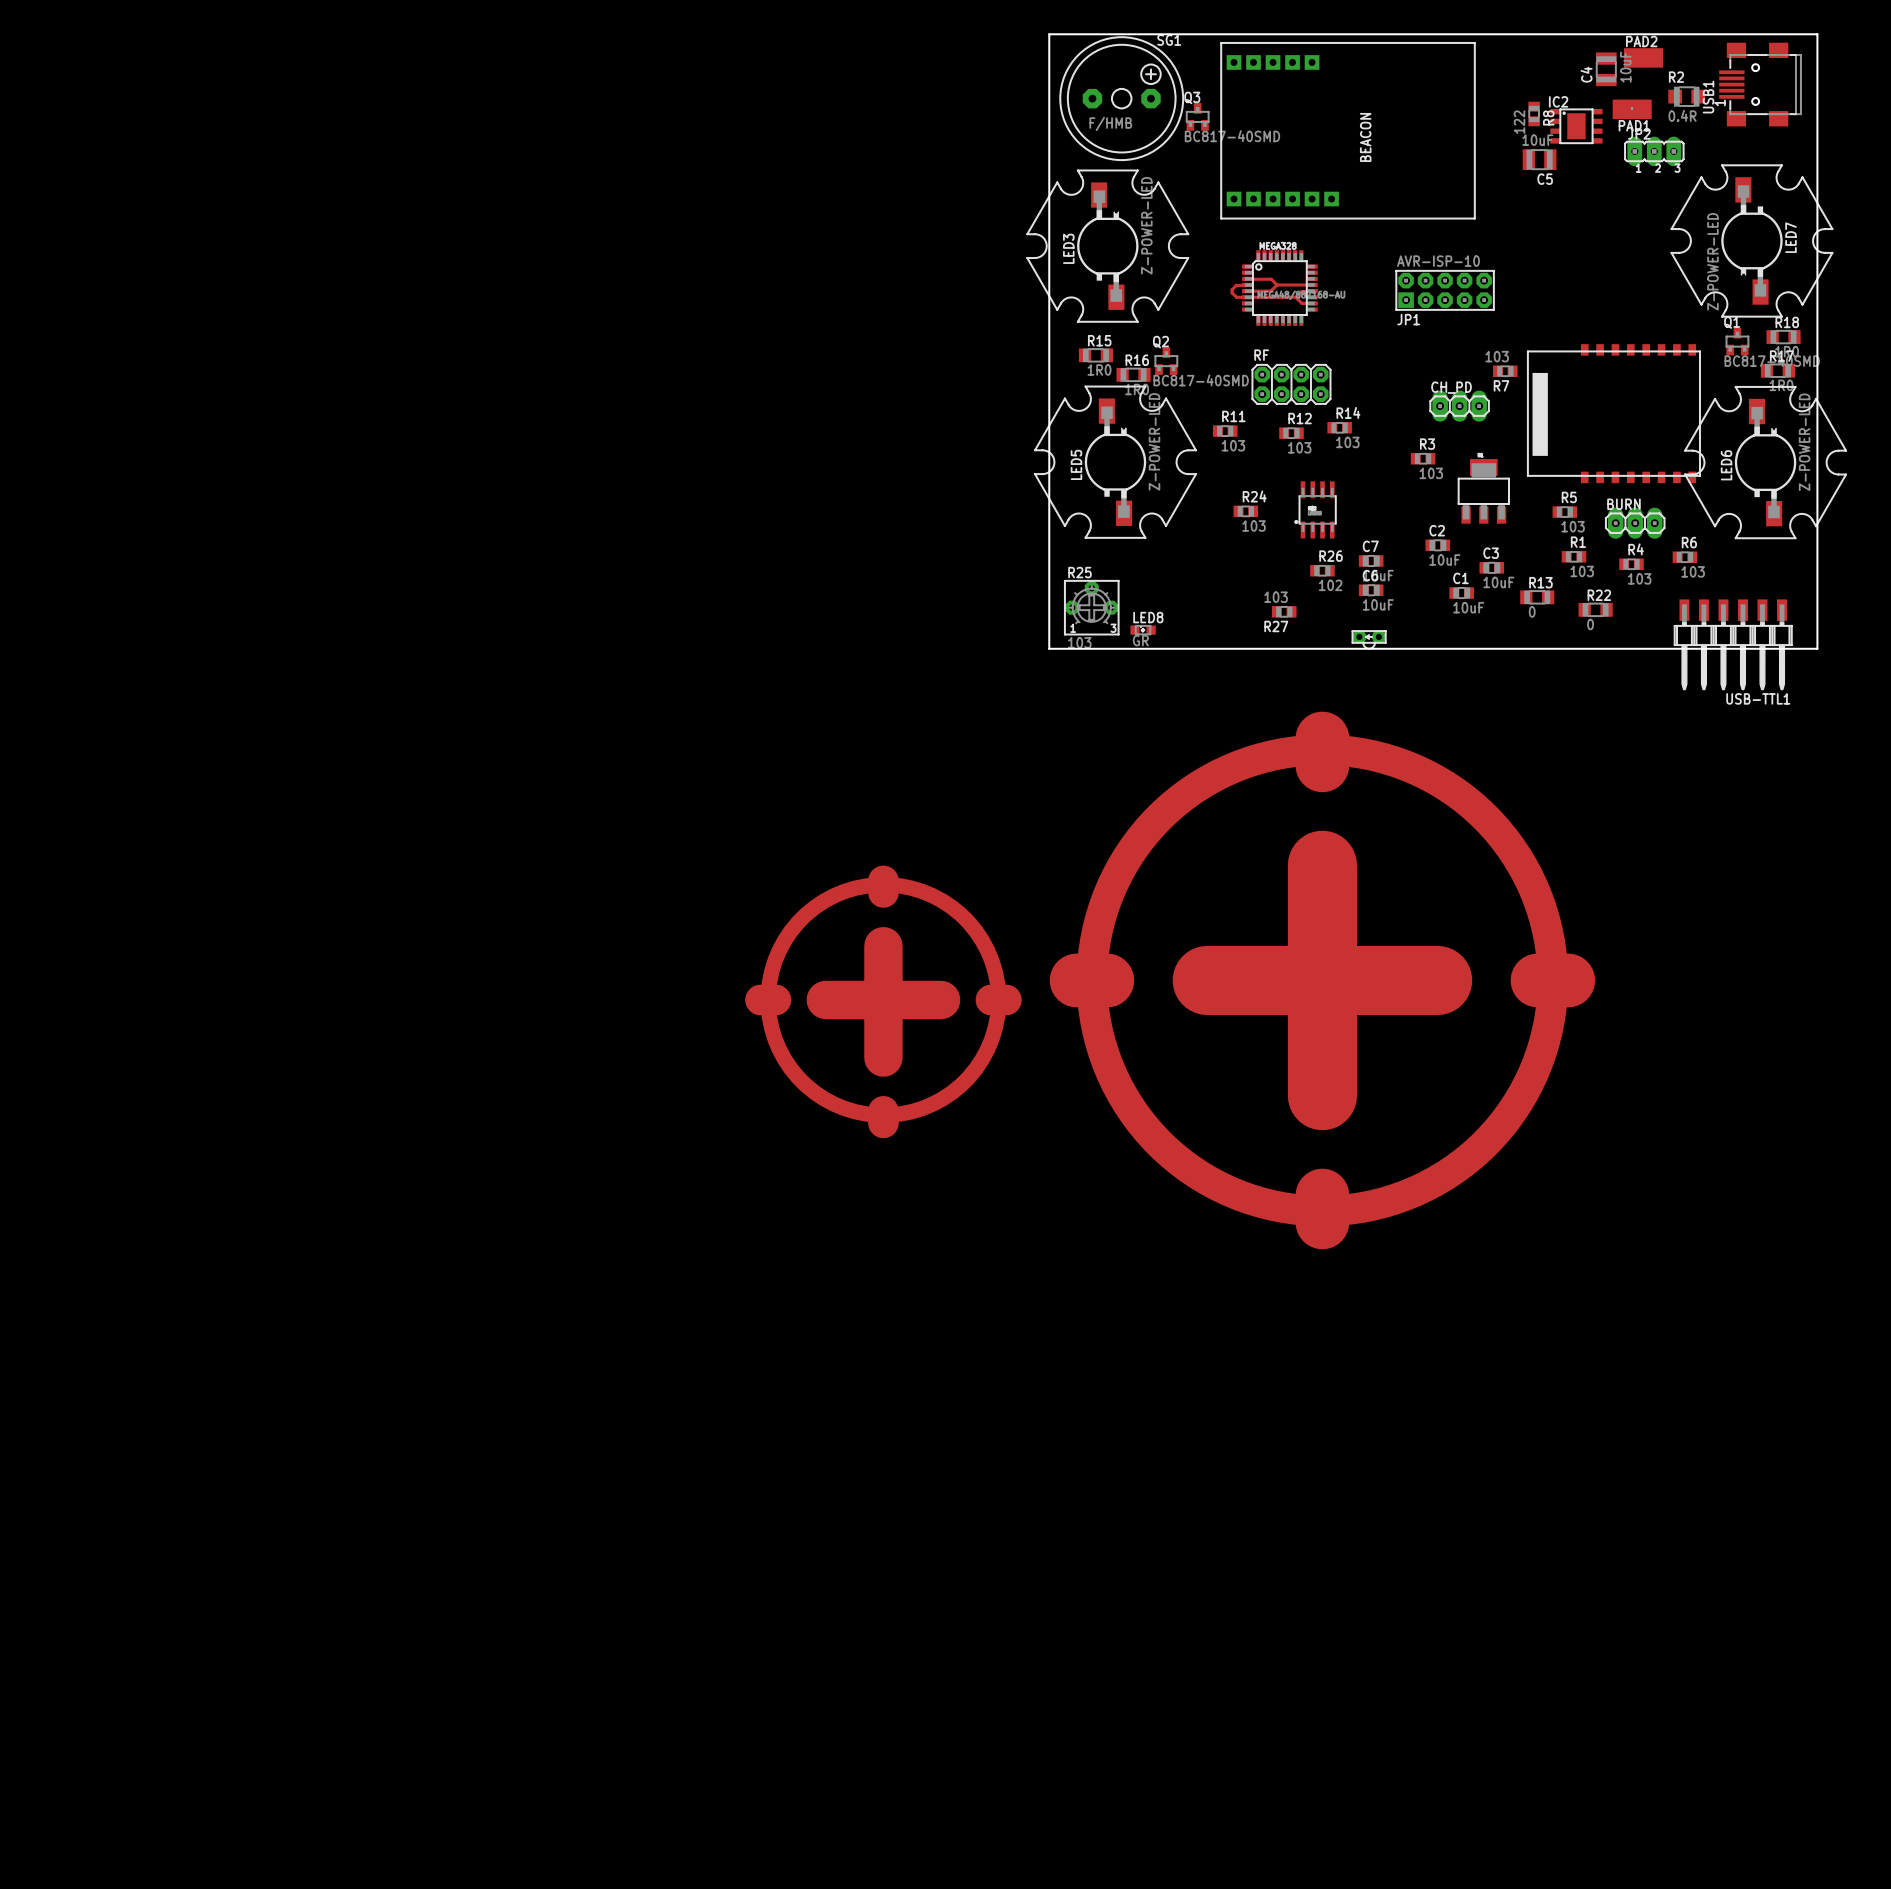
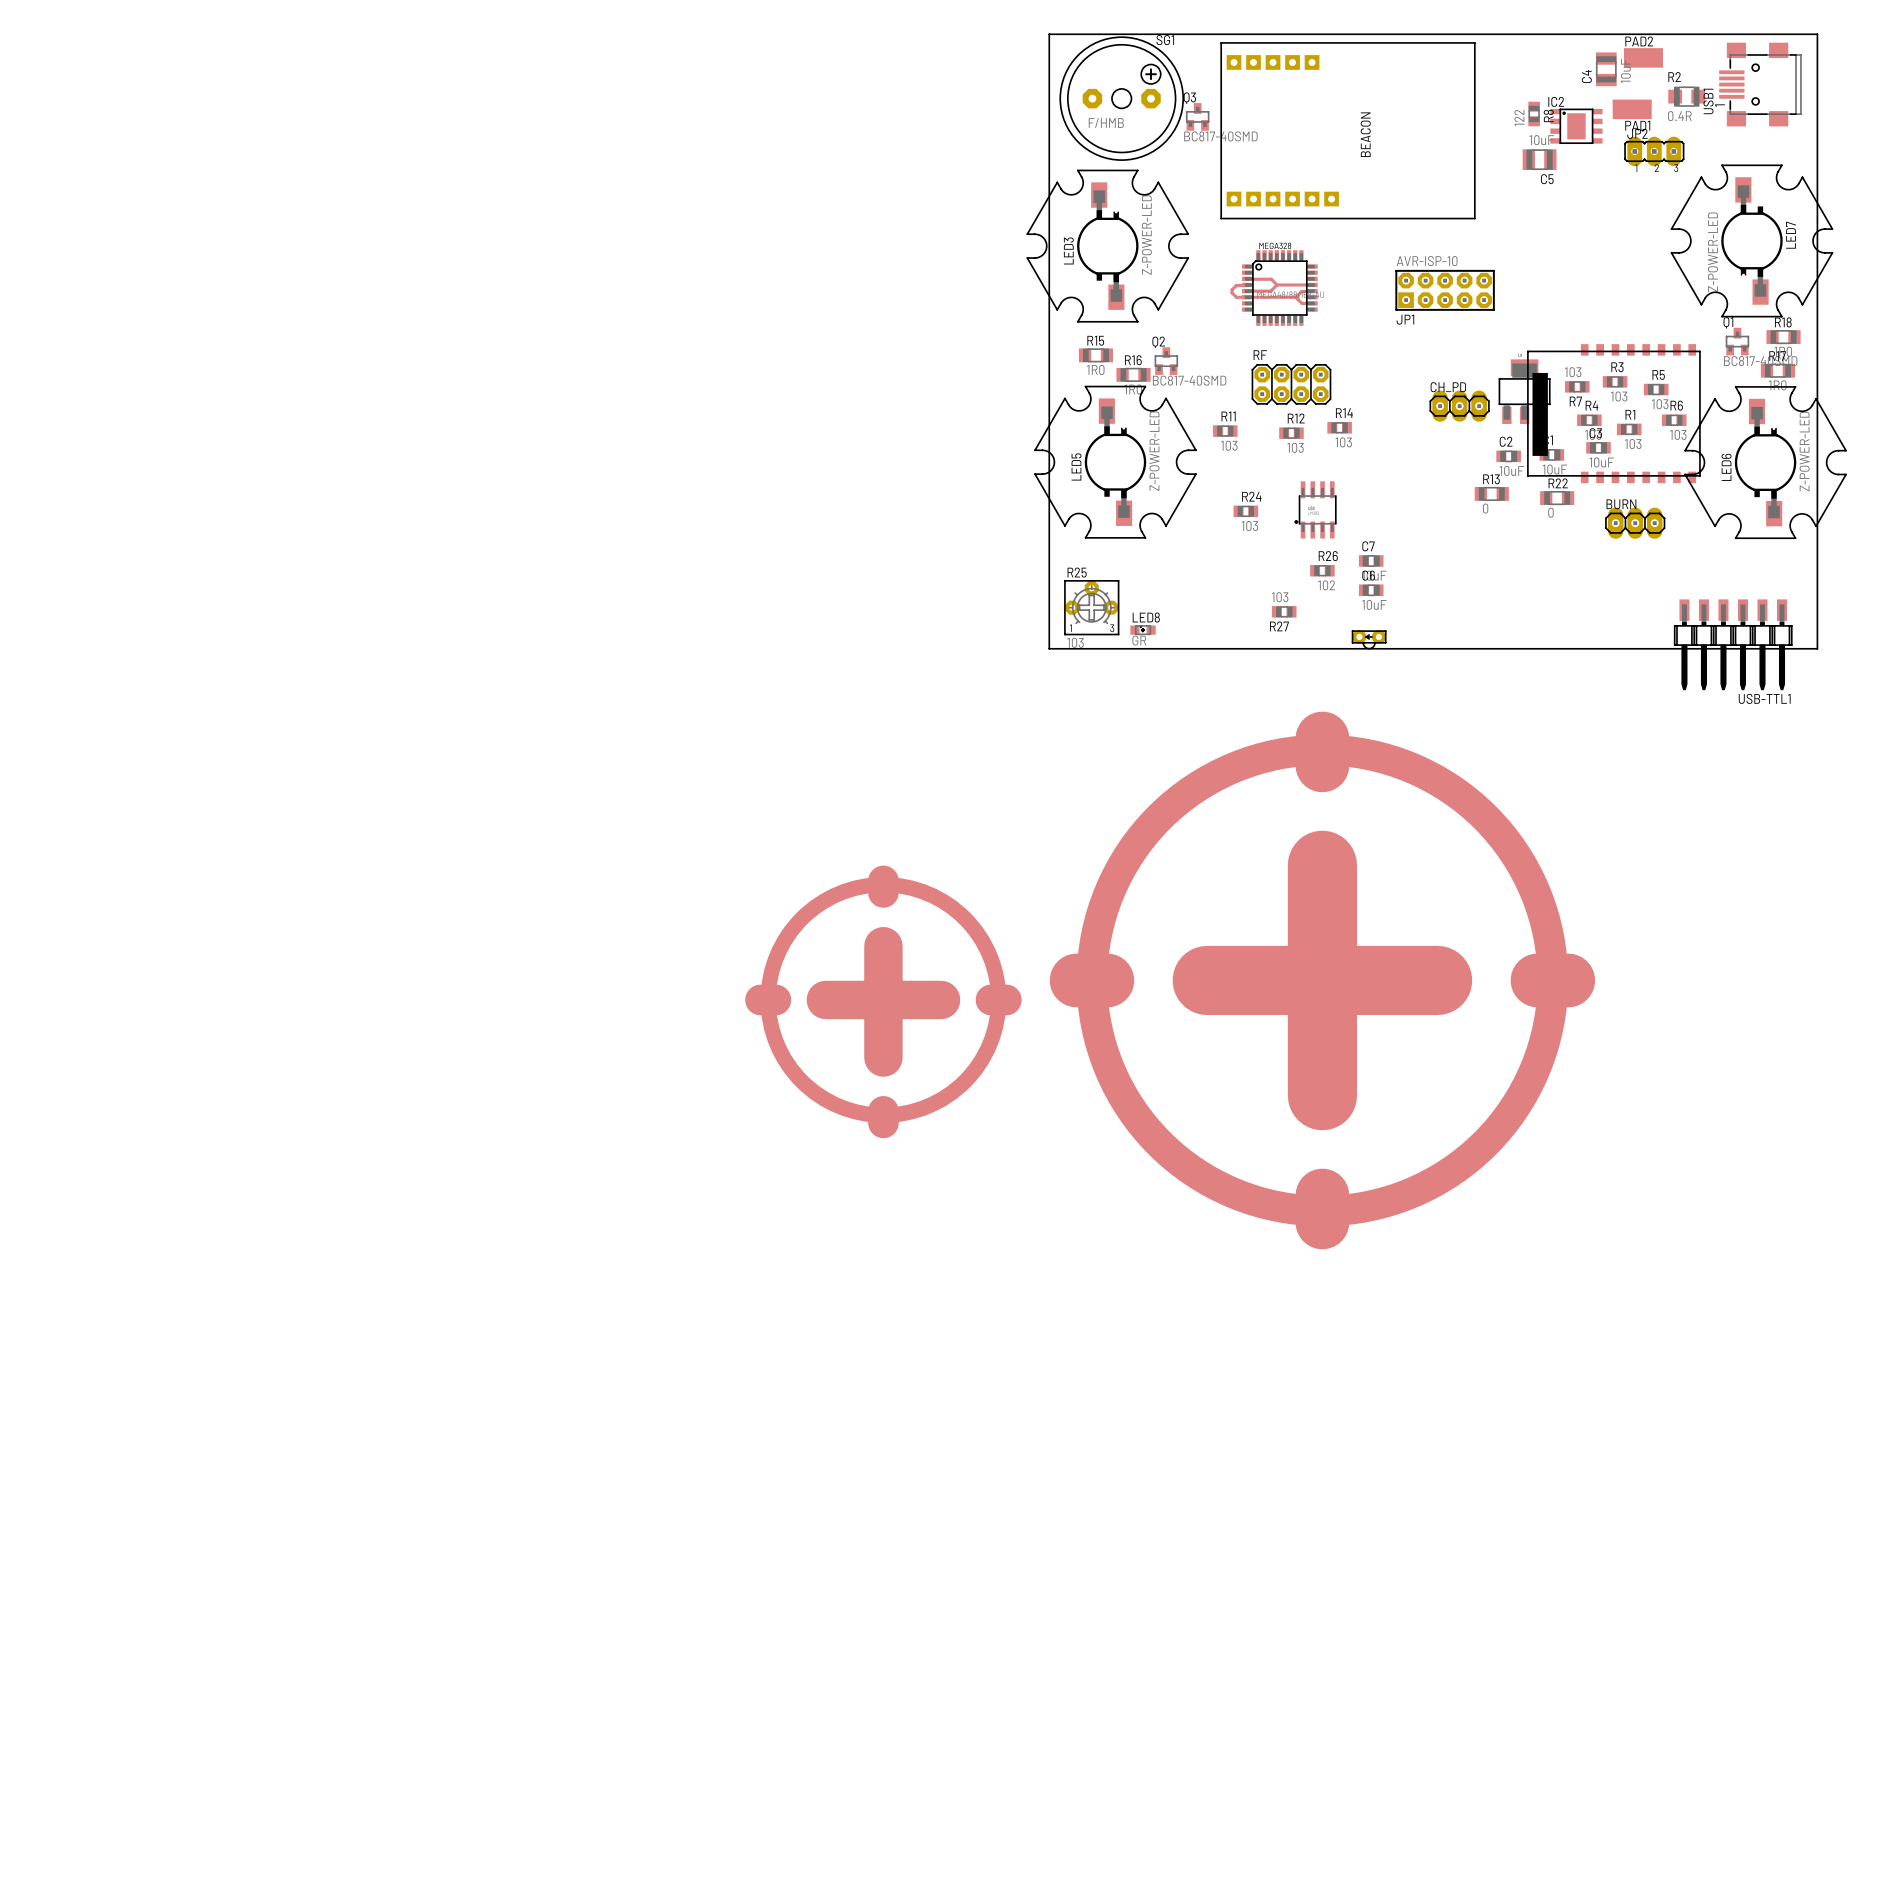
R7 position: (1505, 371) -> (1577, 386)
R3 position: (1423, 458) -> (1615, 381)
part position: (1483, 491) -> (1524, 391)
R5 position: (1564, 512) -> (1656, 389)
C2 position: (1437, 545) -> (1508, 456)
R1 position: (1574, 556) -> (1629, 429)
R6 position: (1684, 557) -> (1674, 420)
R4 position: (1631, 564) -> (1589, 420)
C3 position: (1491, 567) -> (1598, 447)
C1 position: (1461, 593) -> (1551, 454)
R13 position: (1537, 597) -> (1491, 493)
R22 position: (1595, 609) -> (1557, 498)

